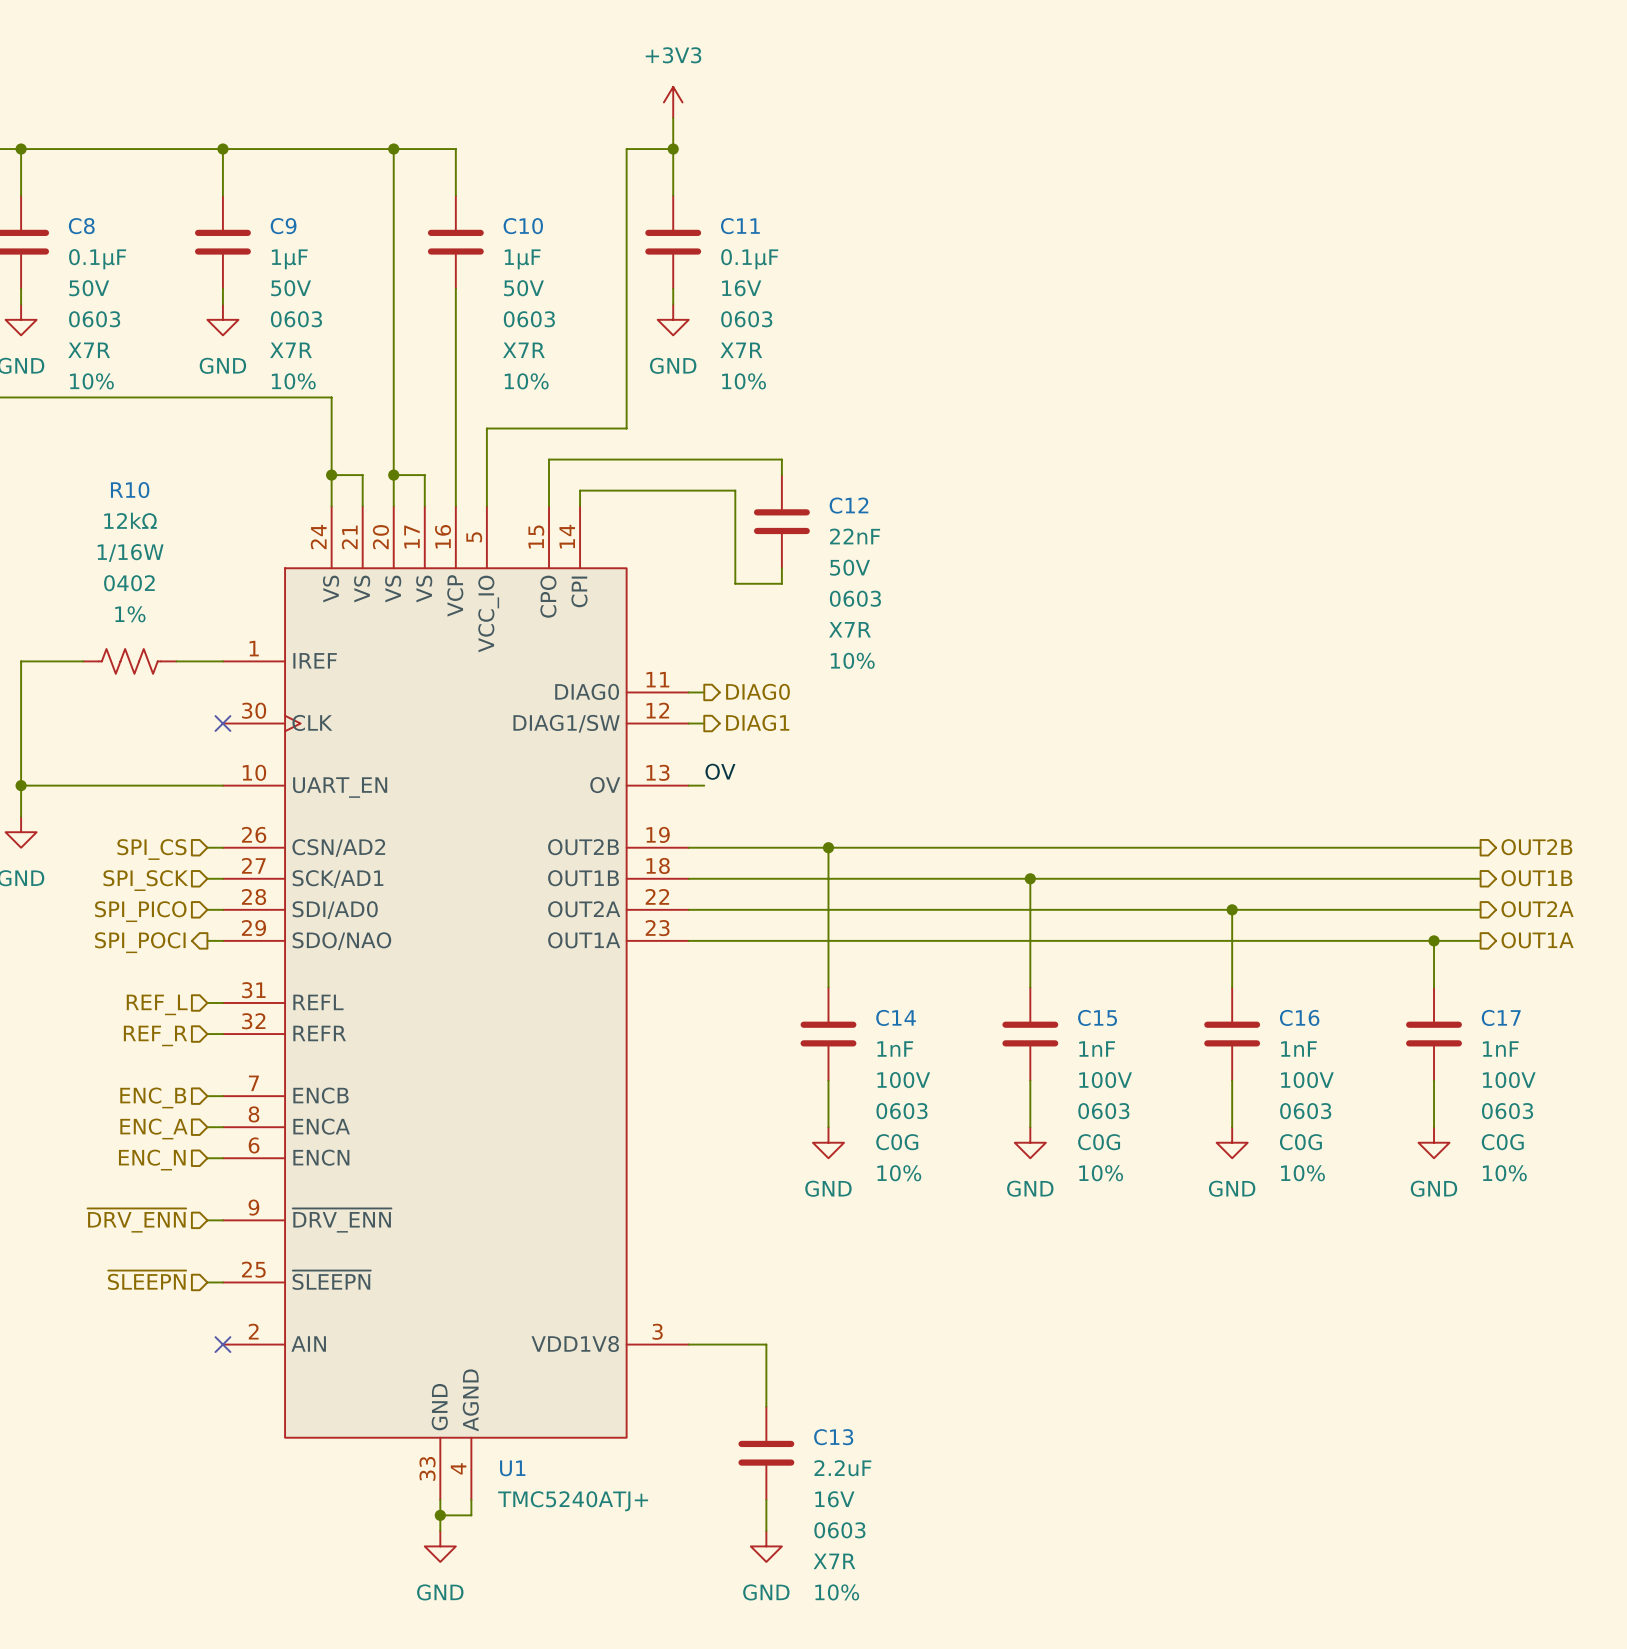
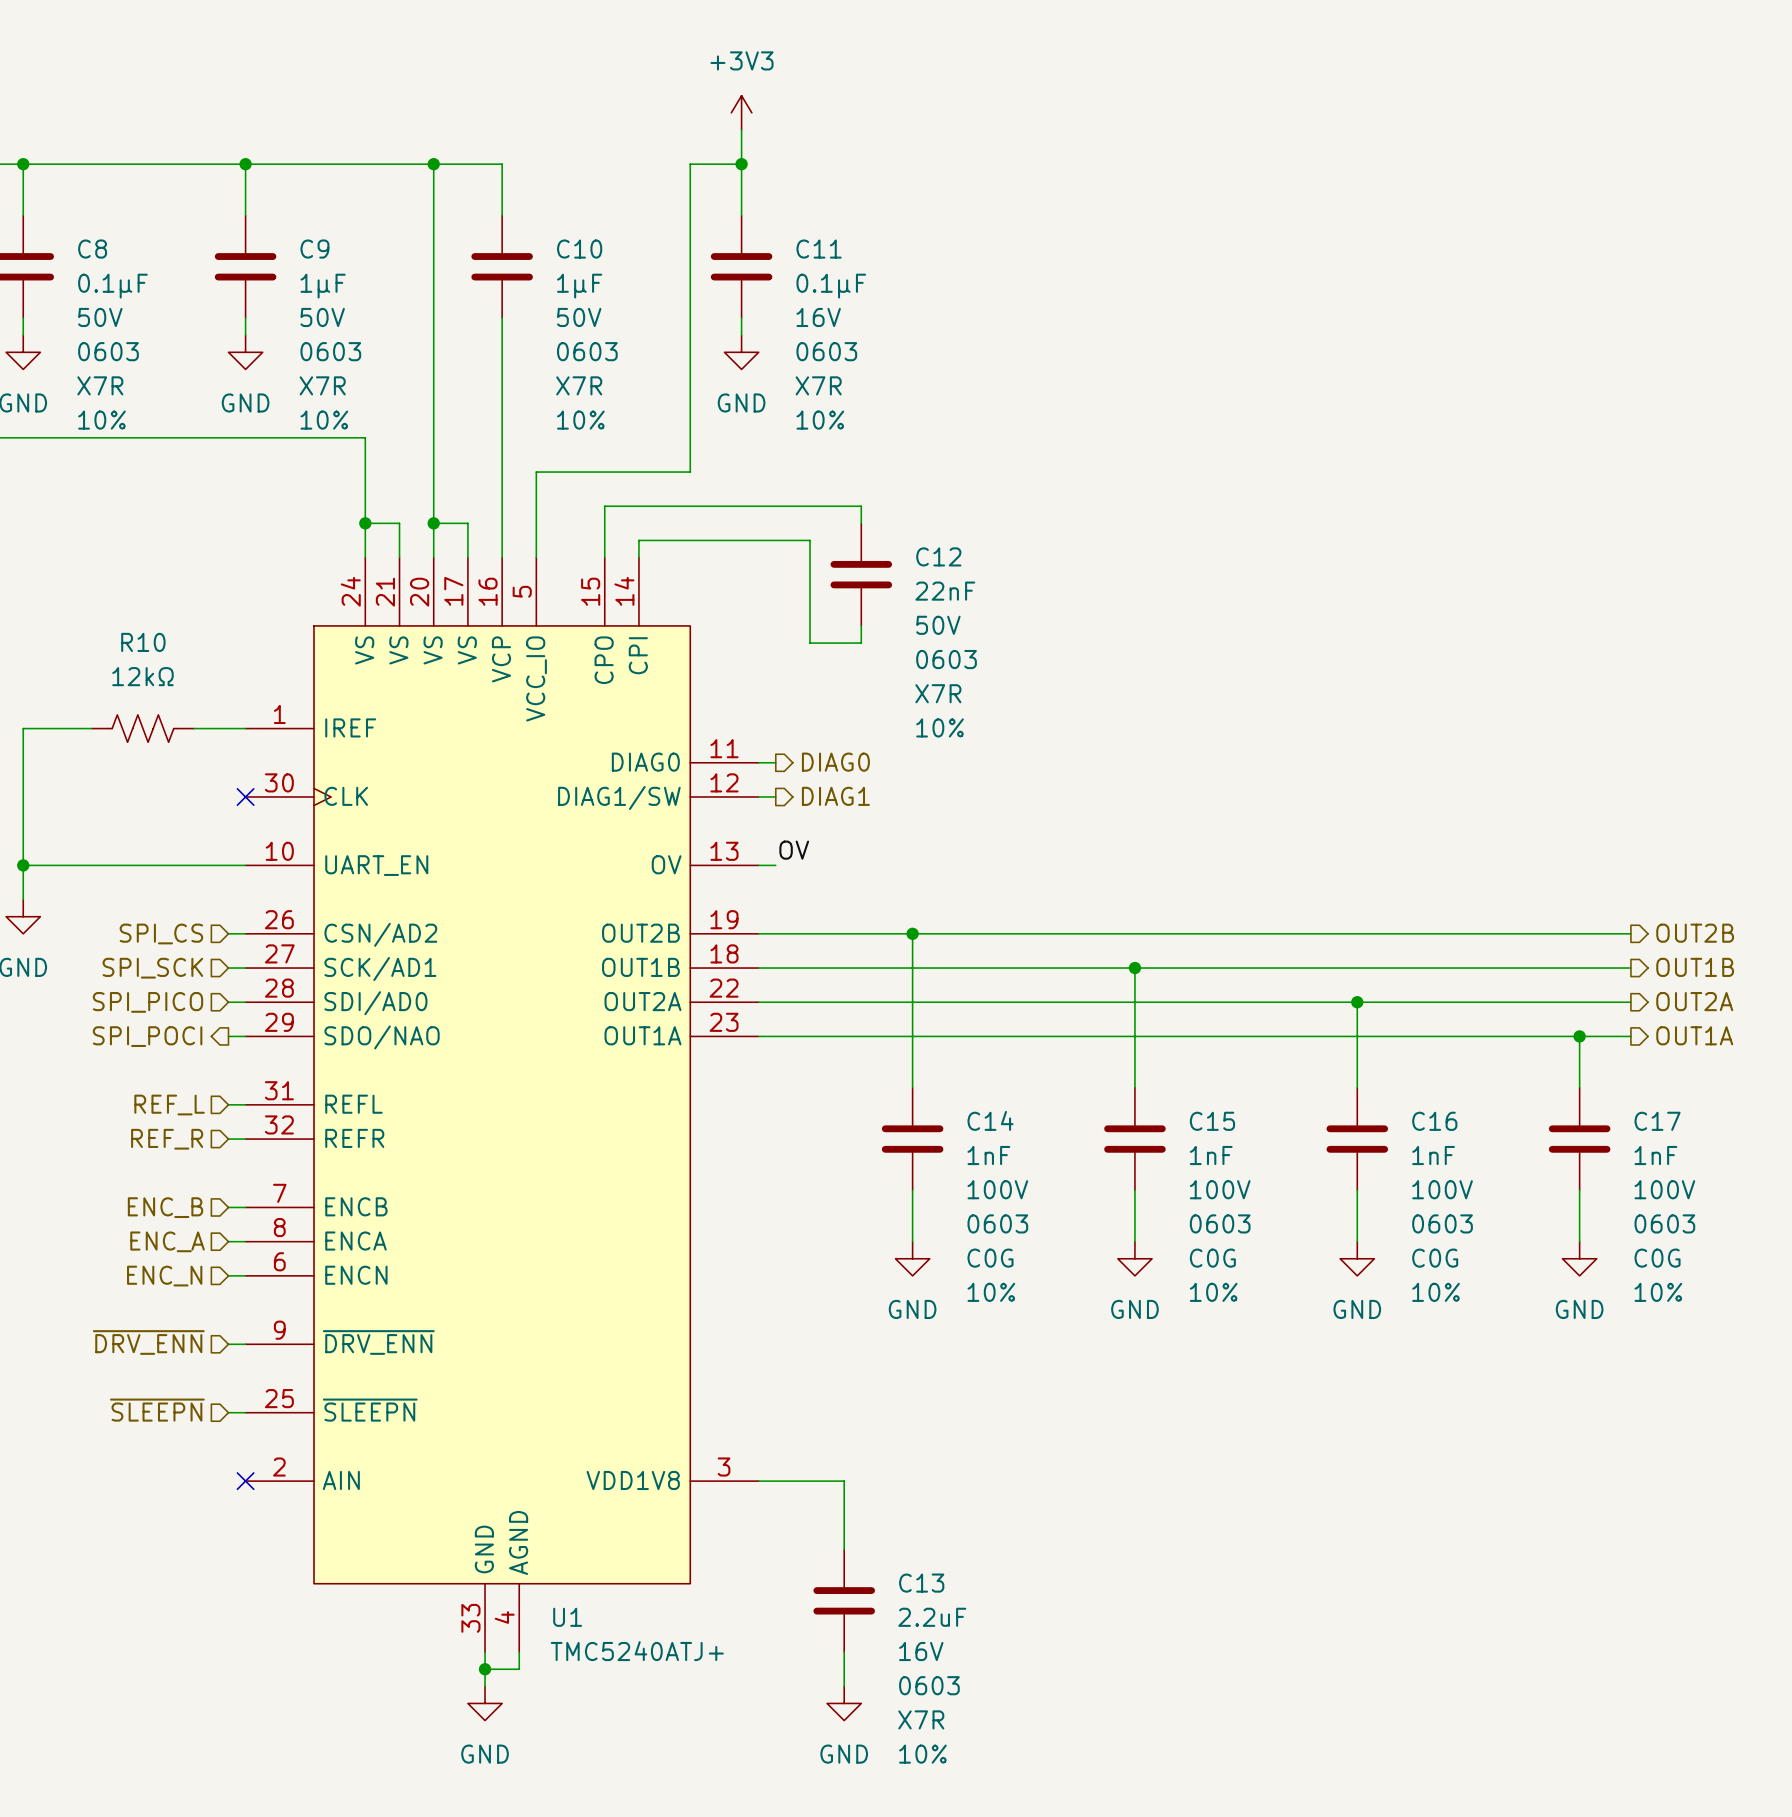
R10 name position: R10 (130, 490) -> R10 (143, 642)
R10 value position: 12kΩ (130, 520) -> 12kΩ (142, 676)
R10 text: 1/16W (130, 552) -> none
R10 text: 0402 (129, 583) -> none
R10 text: 1% (130, 614) -> none

